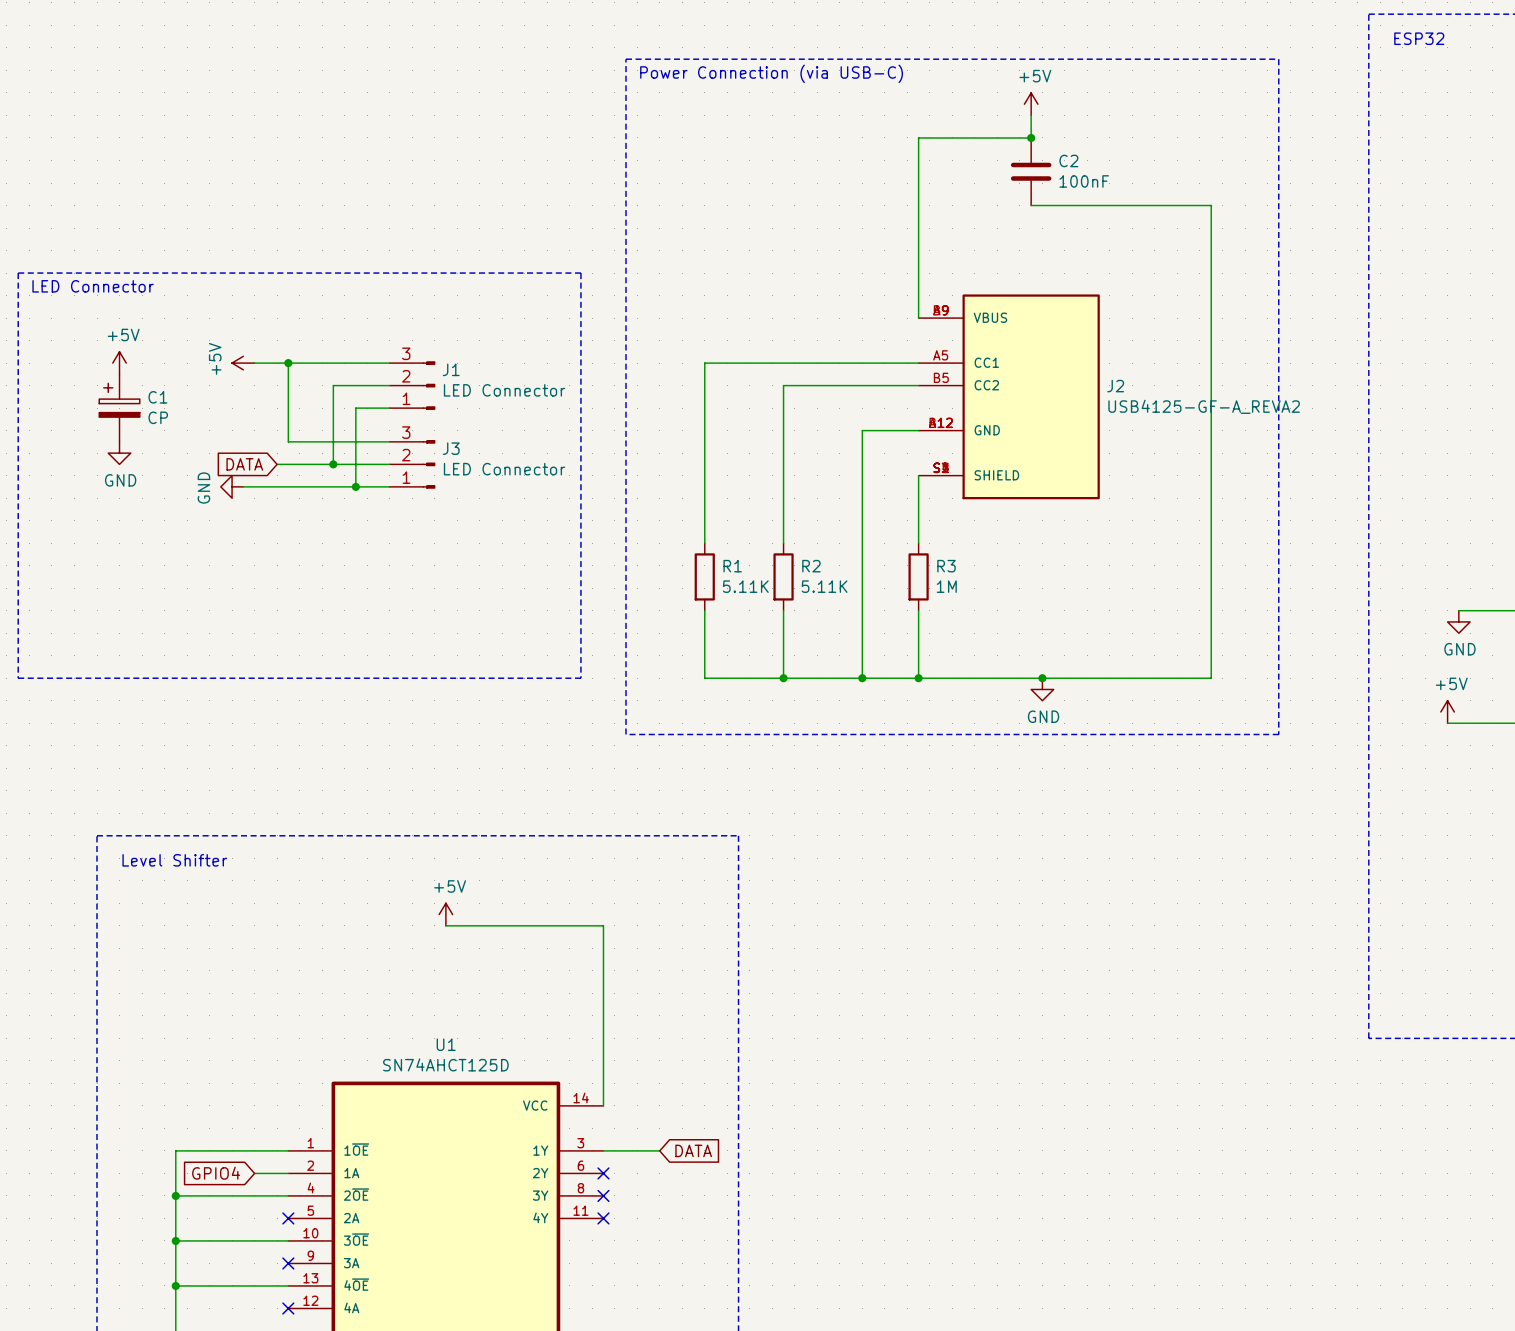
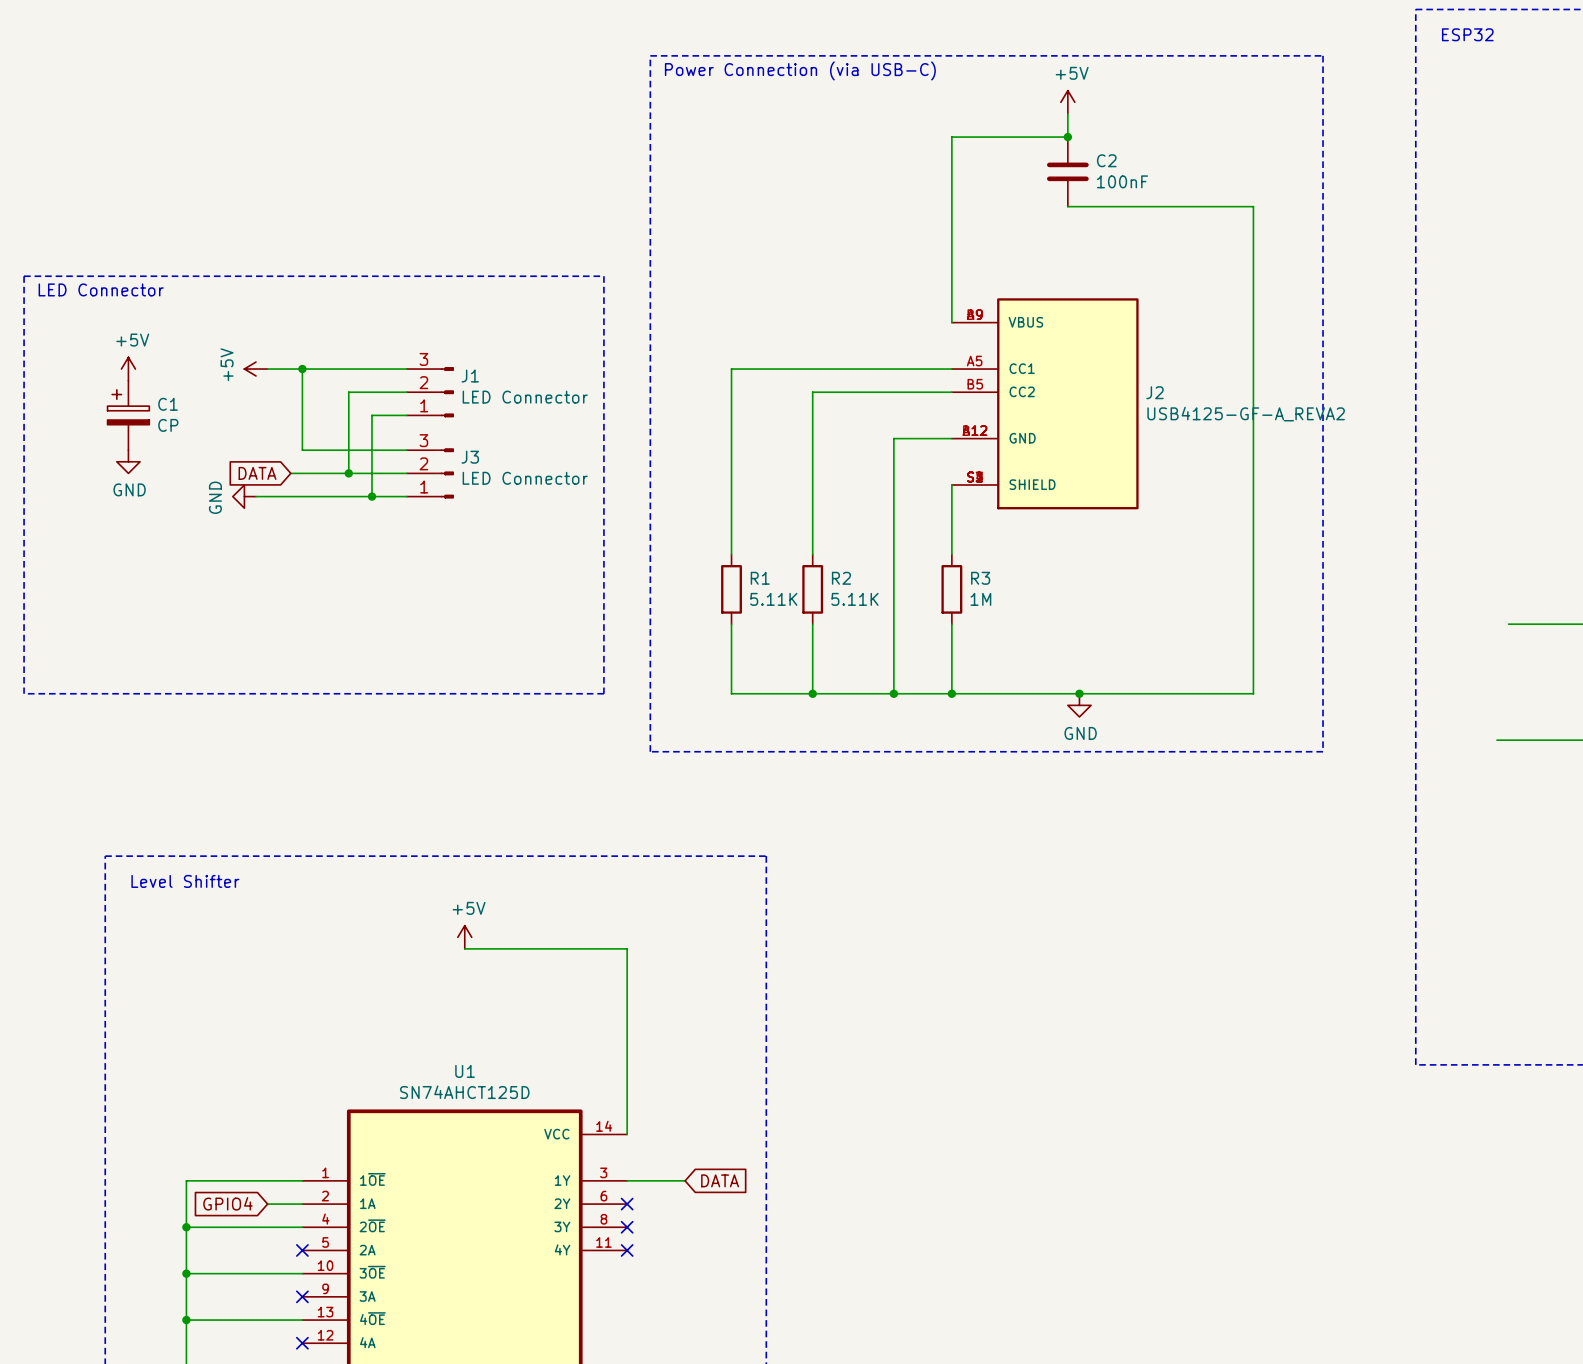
power symbol: GND (1458, 621) -> none
power symbol: +5V (1447, 711) -> none

